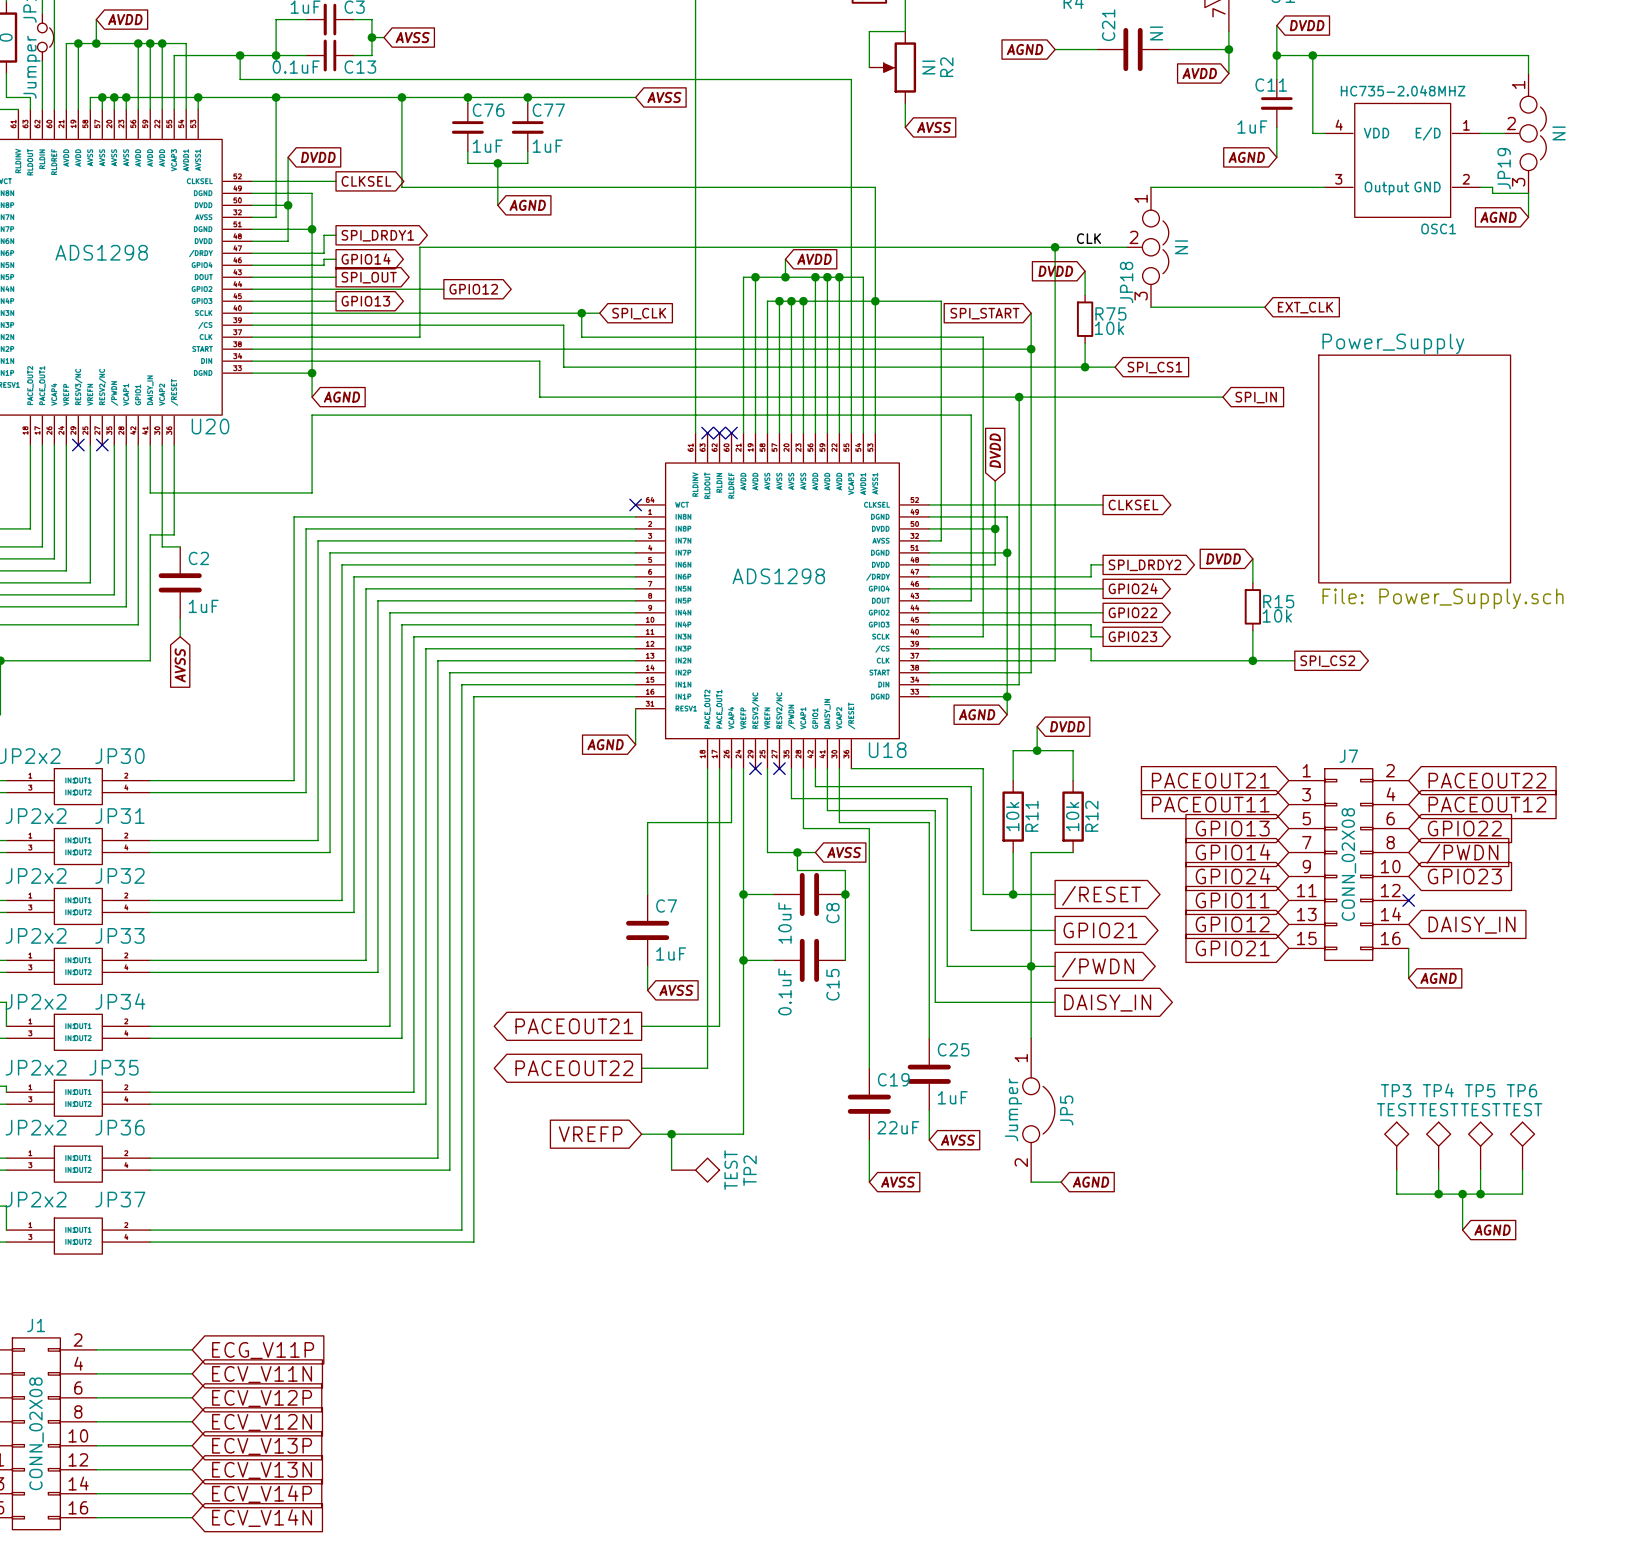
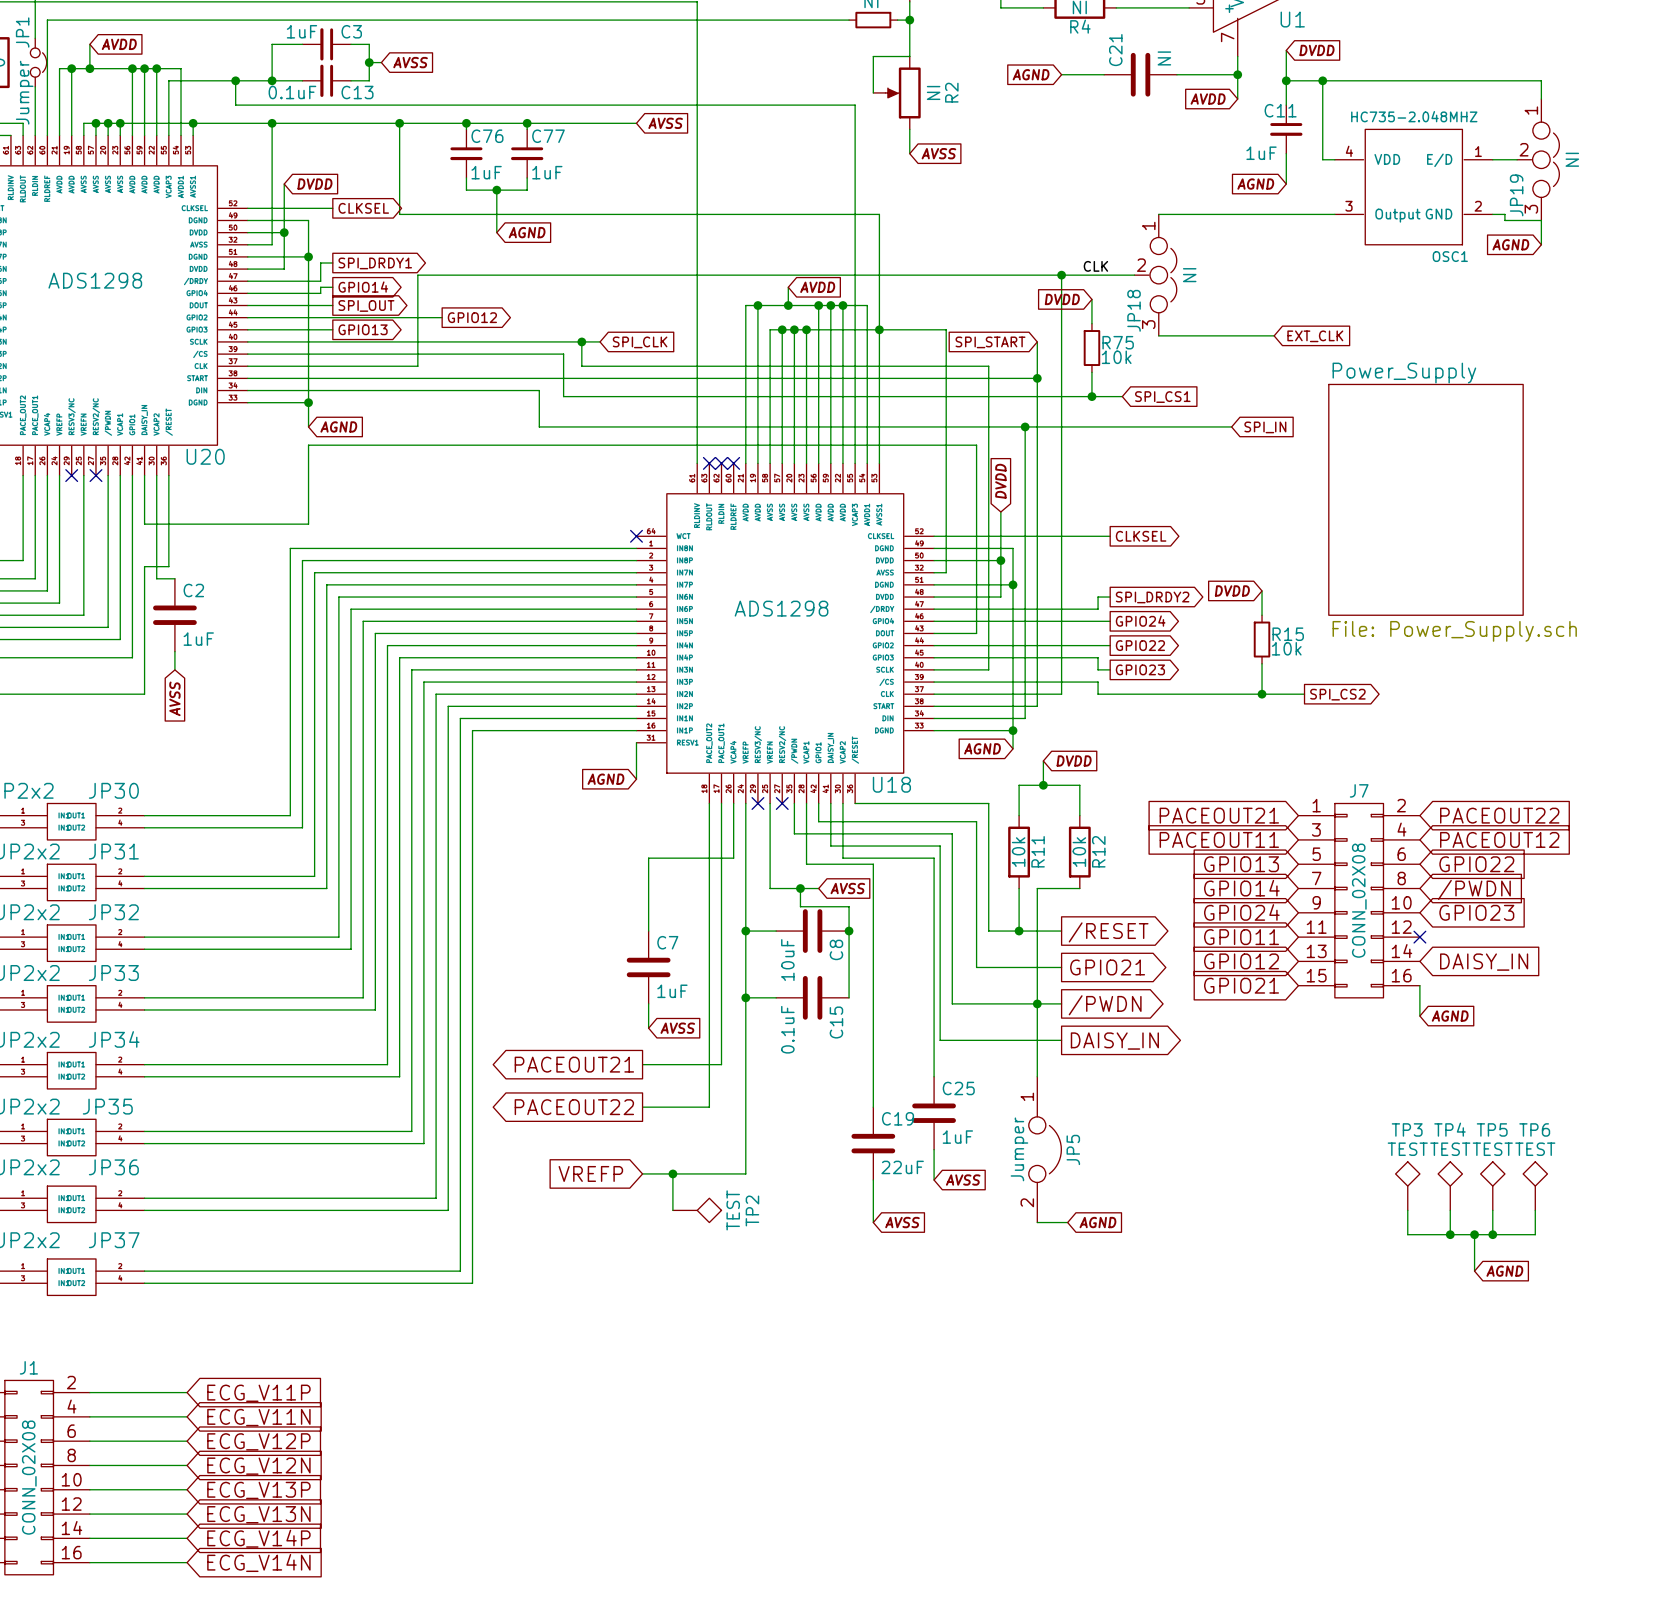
global label: ECV_V11N (262, 1374) -> ECG_V11N (258, 1417)
global label: ECV_V12P (262, 1398) -> ECG_V12P (258, 1441)
global label: ECV_V12N (262, 1422) -> ECG_V12N (258, 1466)
global label: ECV_V13P (262, 1446) -> ECG_V13P (258, 1490)
global label: ECV_V13N (262, 1470) -> ECG_V13N (258, 1514)
global label: ECV_V14P (262, 1494) -> ECG_V14P (258, 1538)
global label: ECV_V14N (262, 1518) -> ECG_V14N (258, 1562)

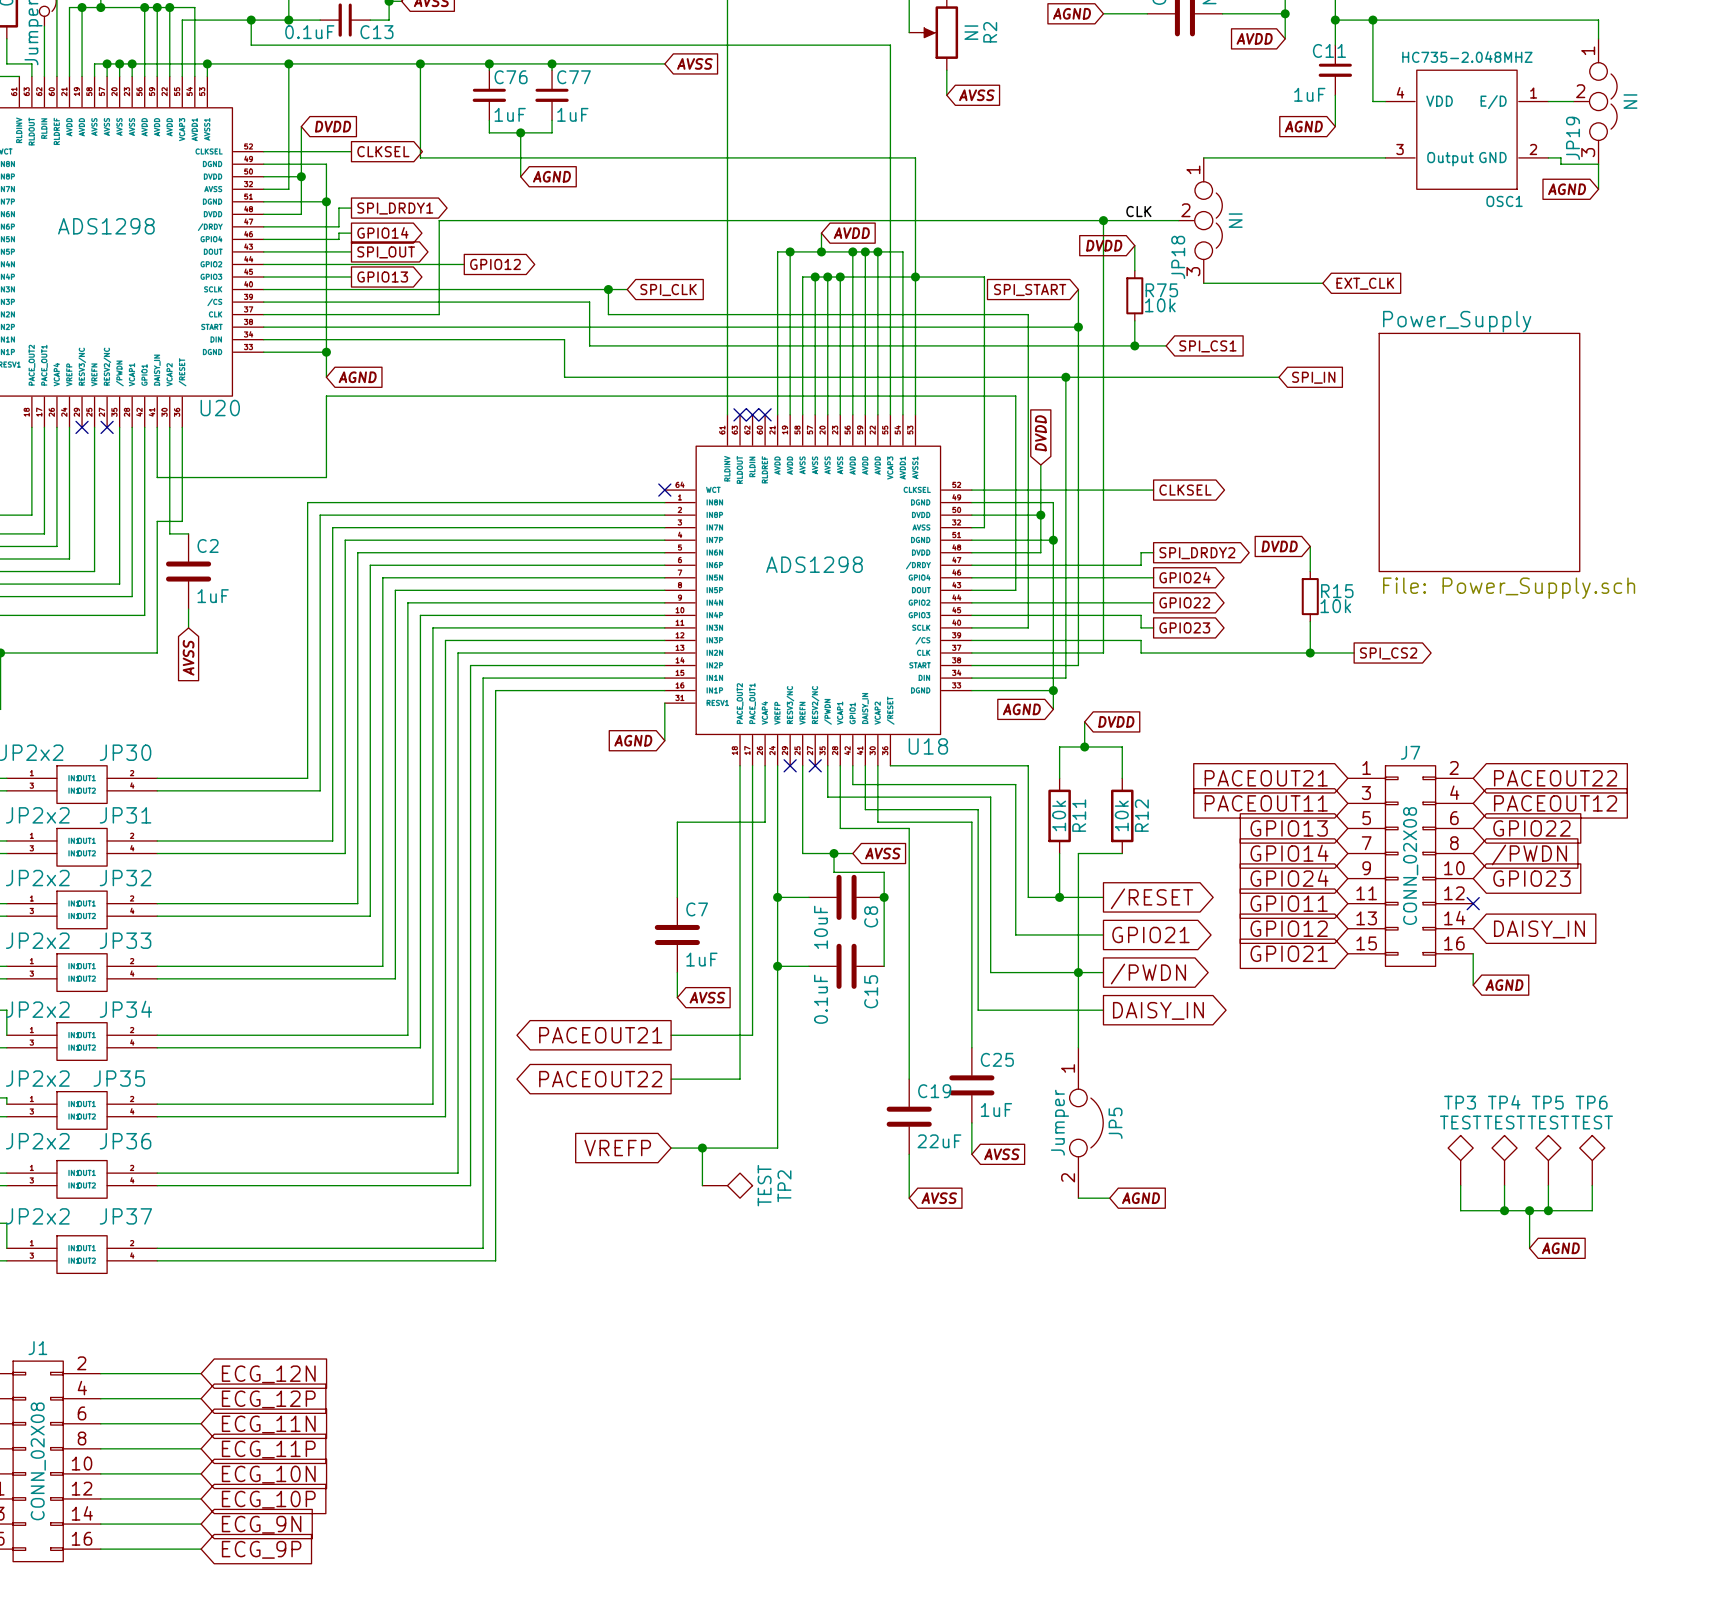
global label: ECG_V11P (258, 1393) -> ECG_12N (268, 1374)
global label: ECG_V11N (258, 1417) -> ECG_12P (268, 1399)
global label: ECG_V12P (258, 1441) -> ECG_11N (268, 1424)
global label: ECG_V12N (258, 1466) -> ECG_11P (268, 1449)
global label: ECG_V13P (258, 1490) -> ECG_10N (268, 1474)
global label: ECG_V13N (258, 1514) -> ECG_10P (268, 1499)
global label: ECG_V14P (258, 1538) -> ECG_9N (261, 1524)
global label: ECG_V14N (258, 1562) -> ECG_9P (261, 1549)

